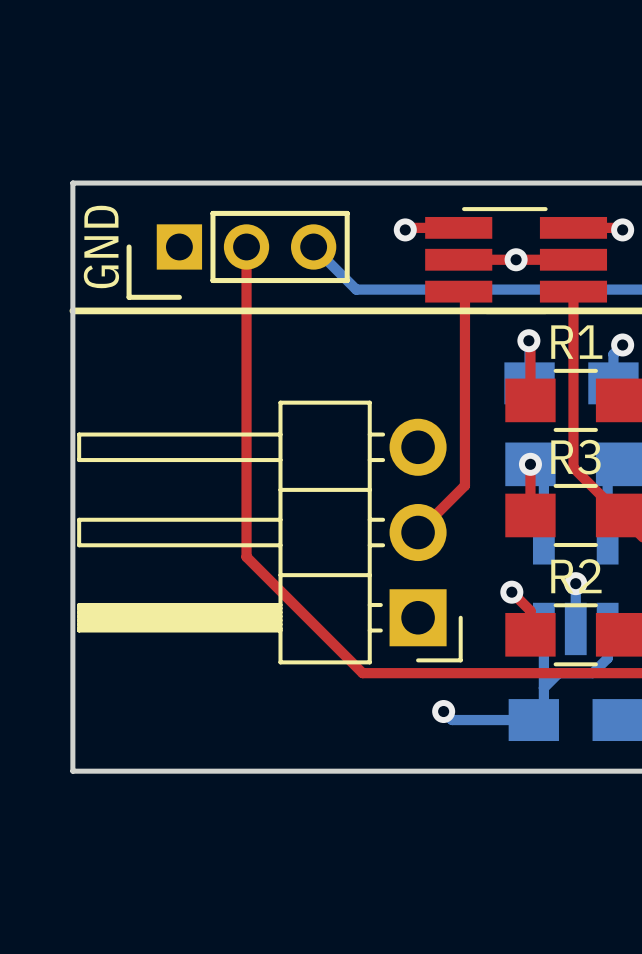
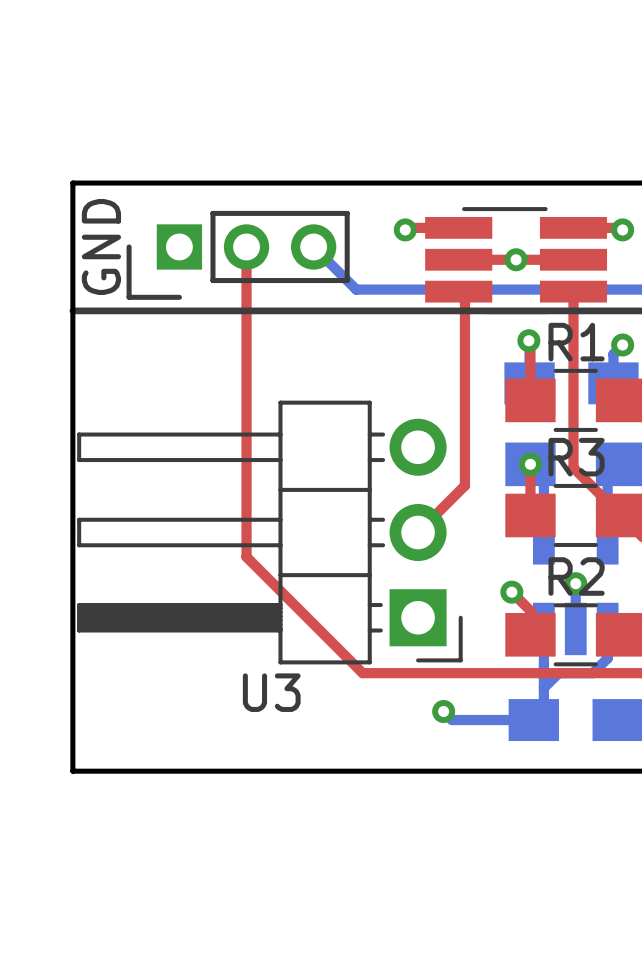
U3 name: none -> U3 (271, 692)

